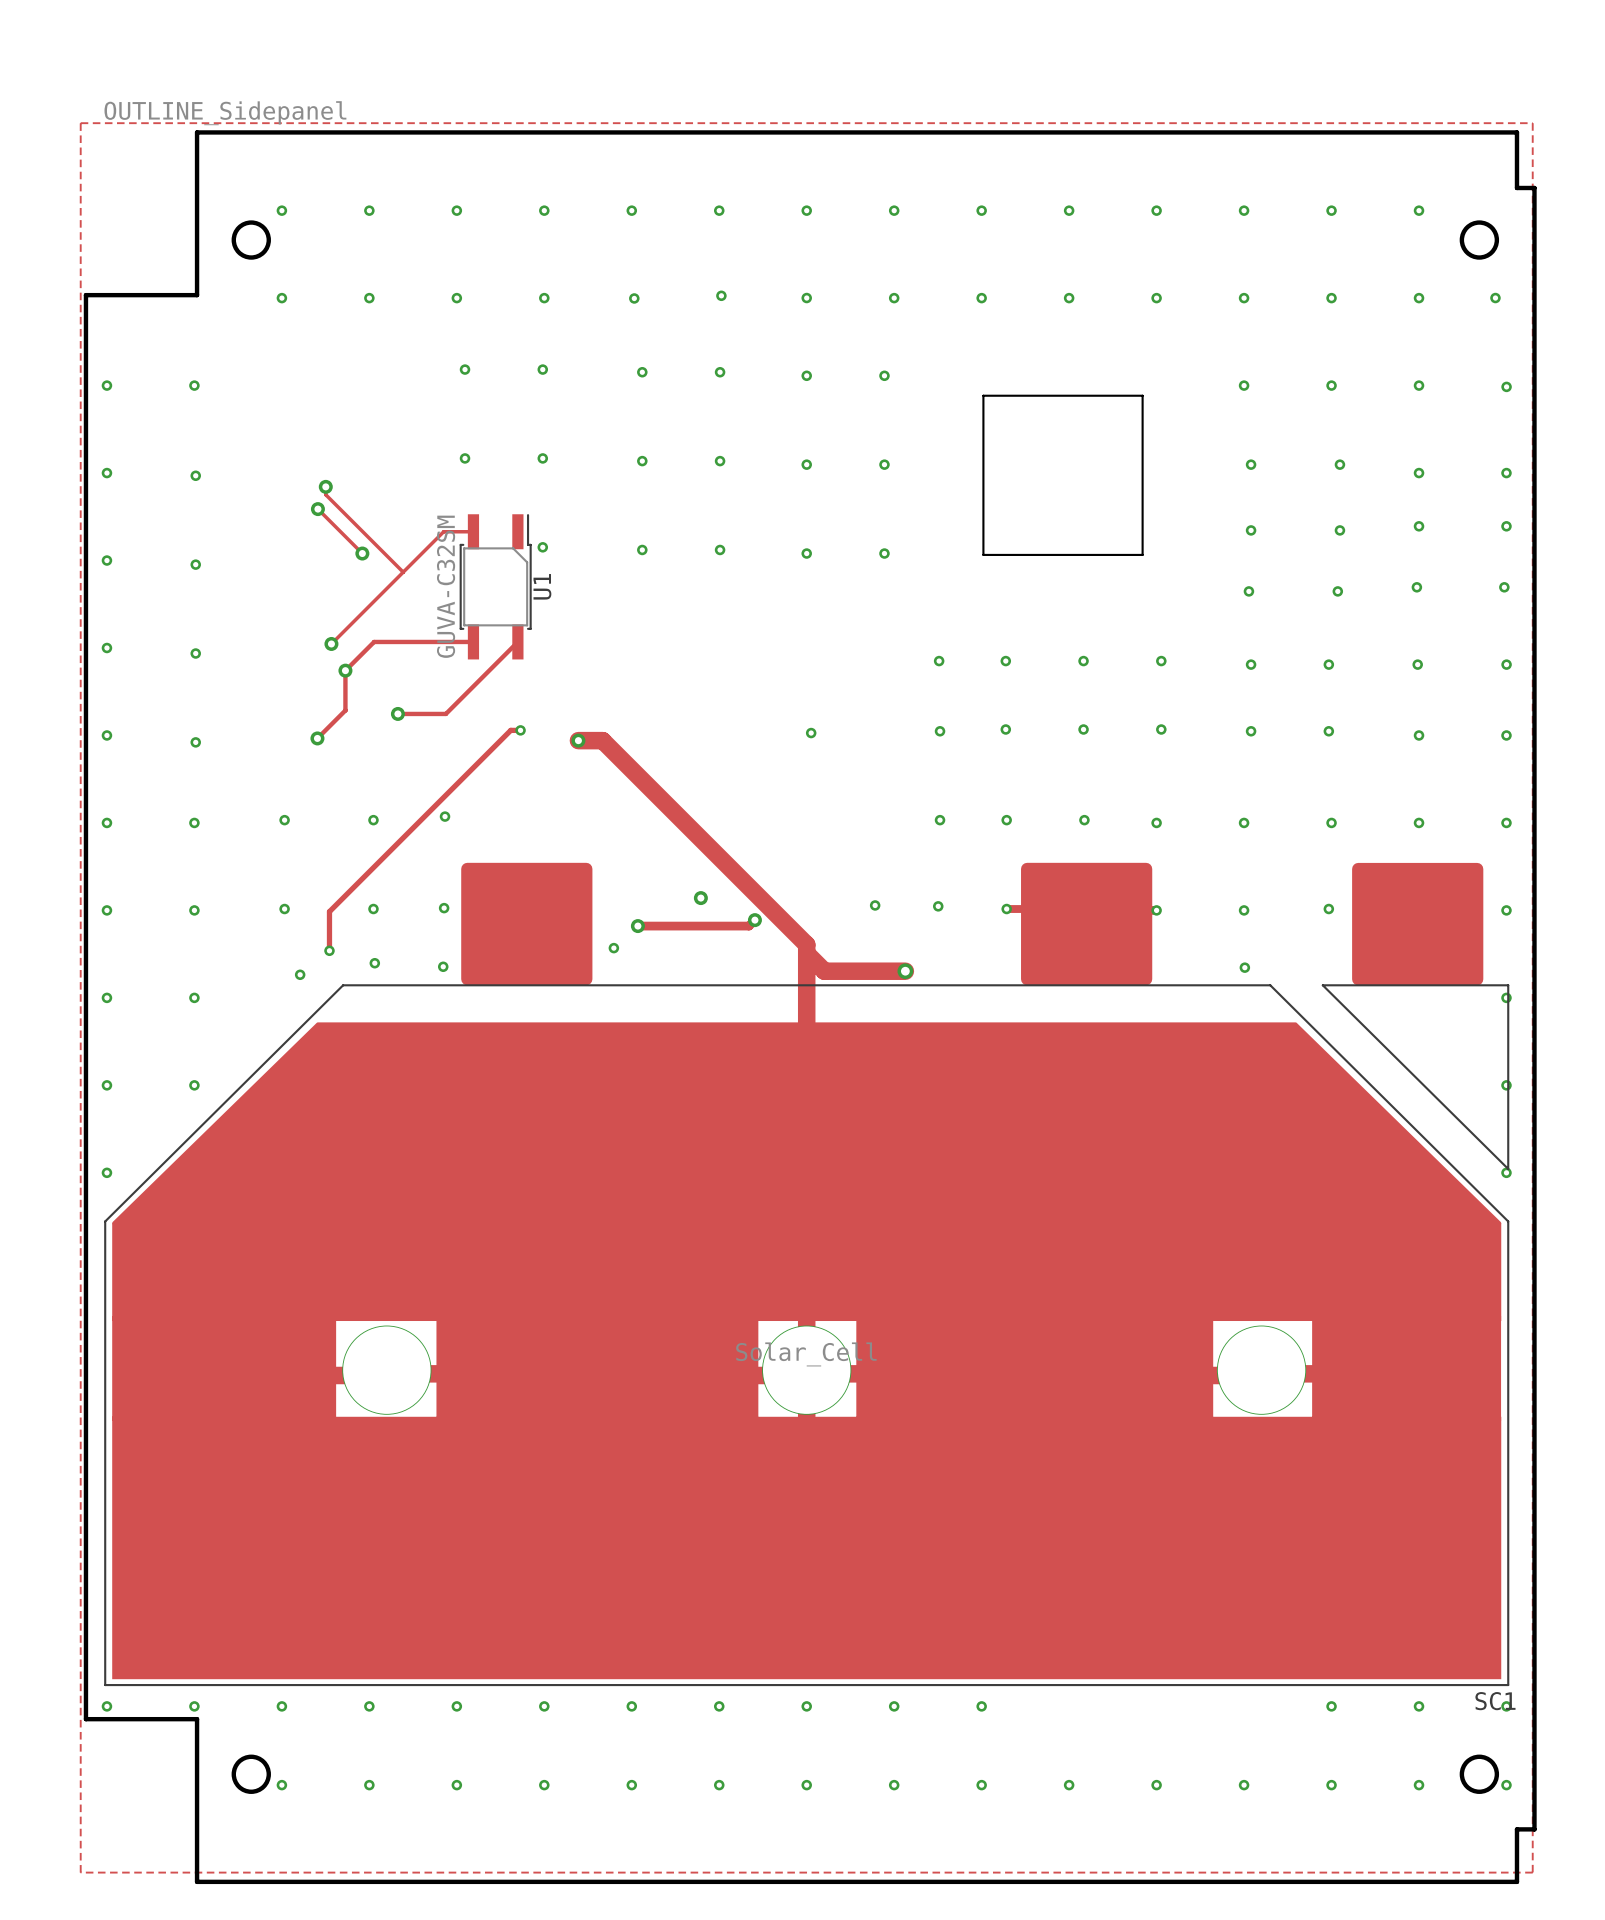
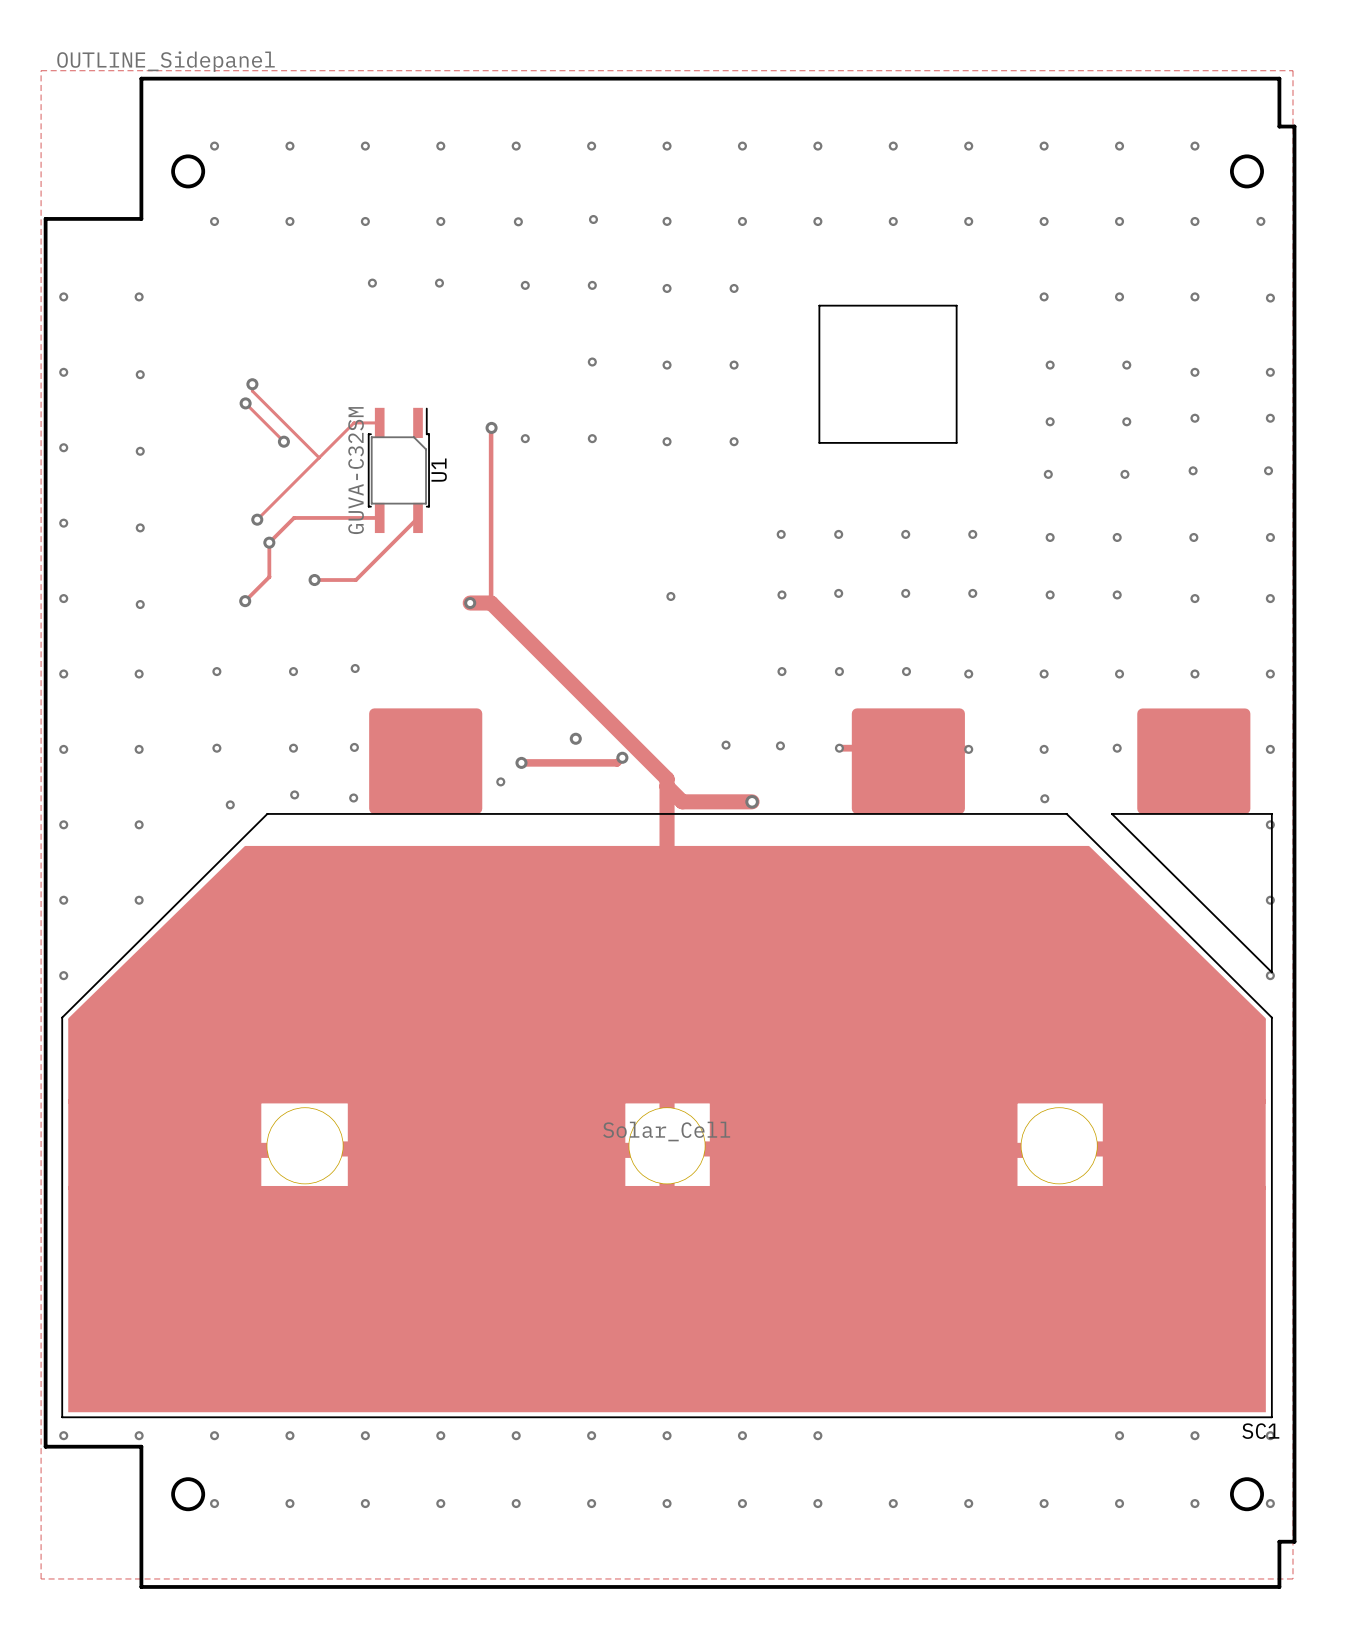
via: (465, 458) -> none
via: (542, 458) -> none
via: (642, 461) -> none
track: none -> (491, 427) (491, 603)
via: none -> (491, 427)
via: (542, 547) -> none
track: (520, 730) (510, 730) (329, 911) (329, 950) -> none
via: (520, 730) -> none
via: (329, 950) -> none

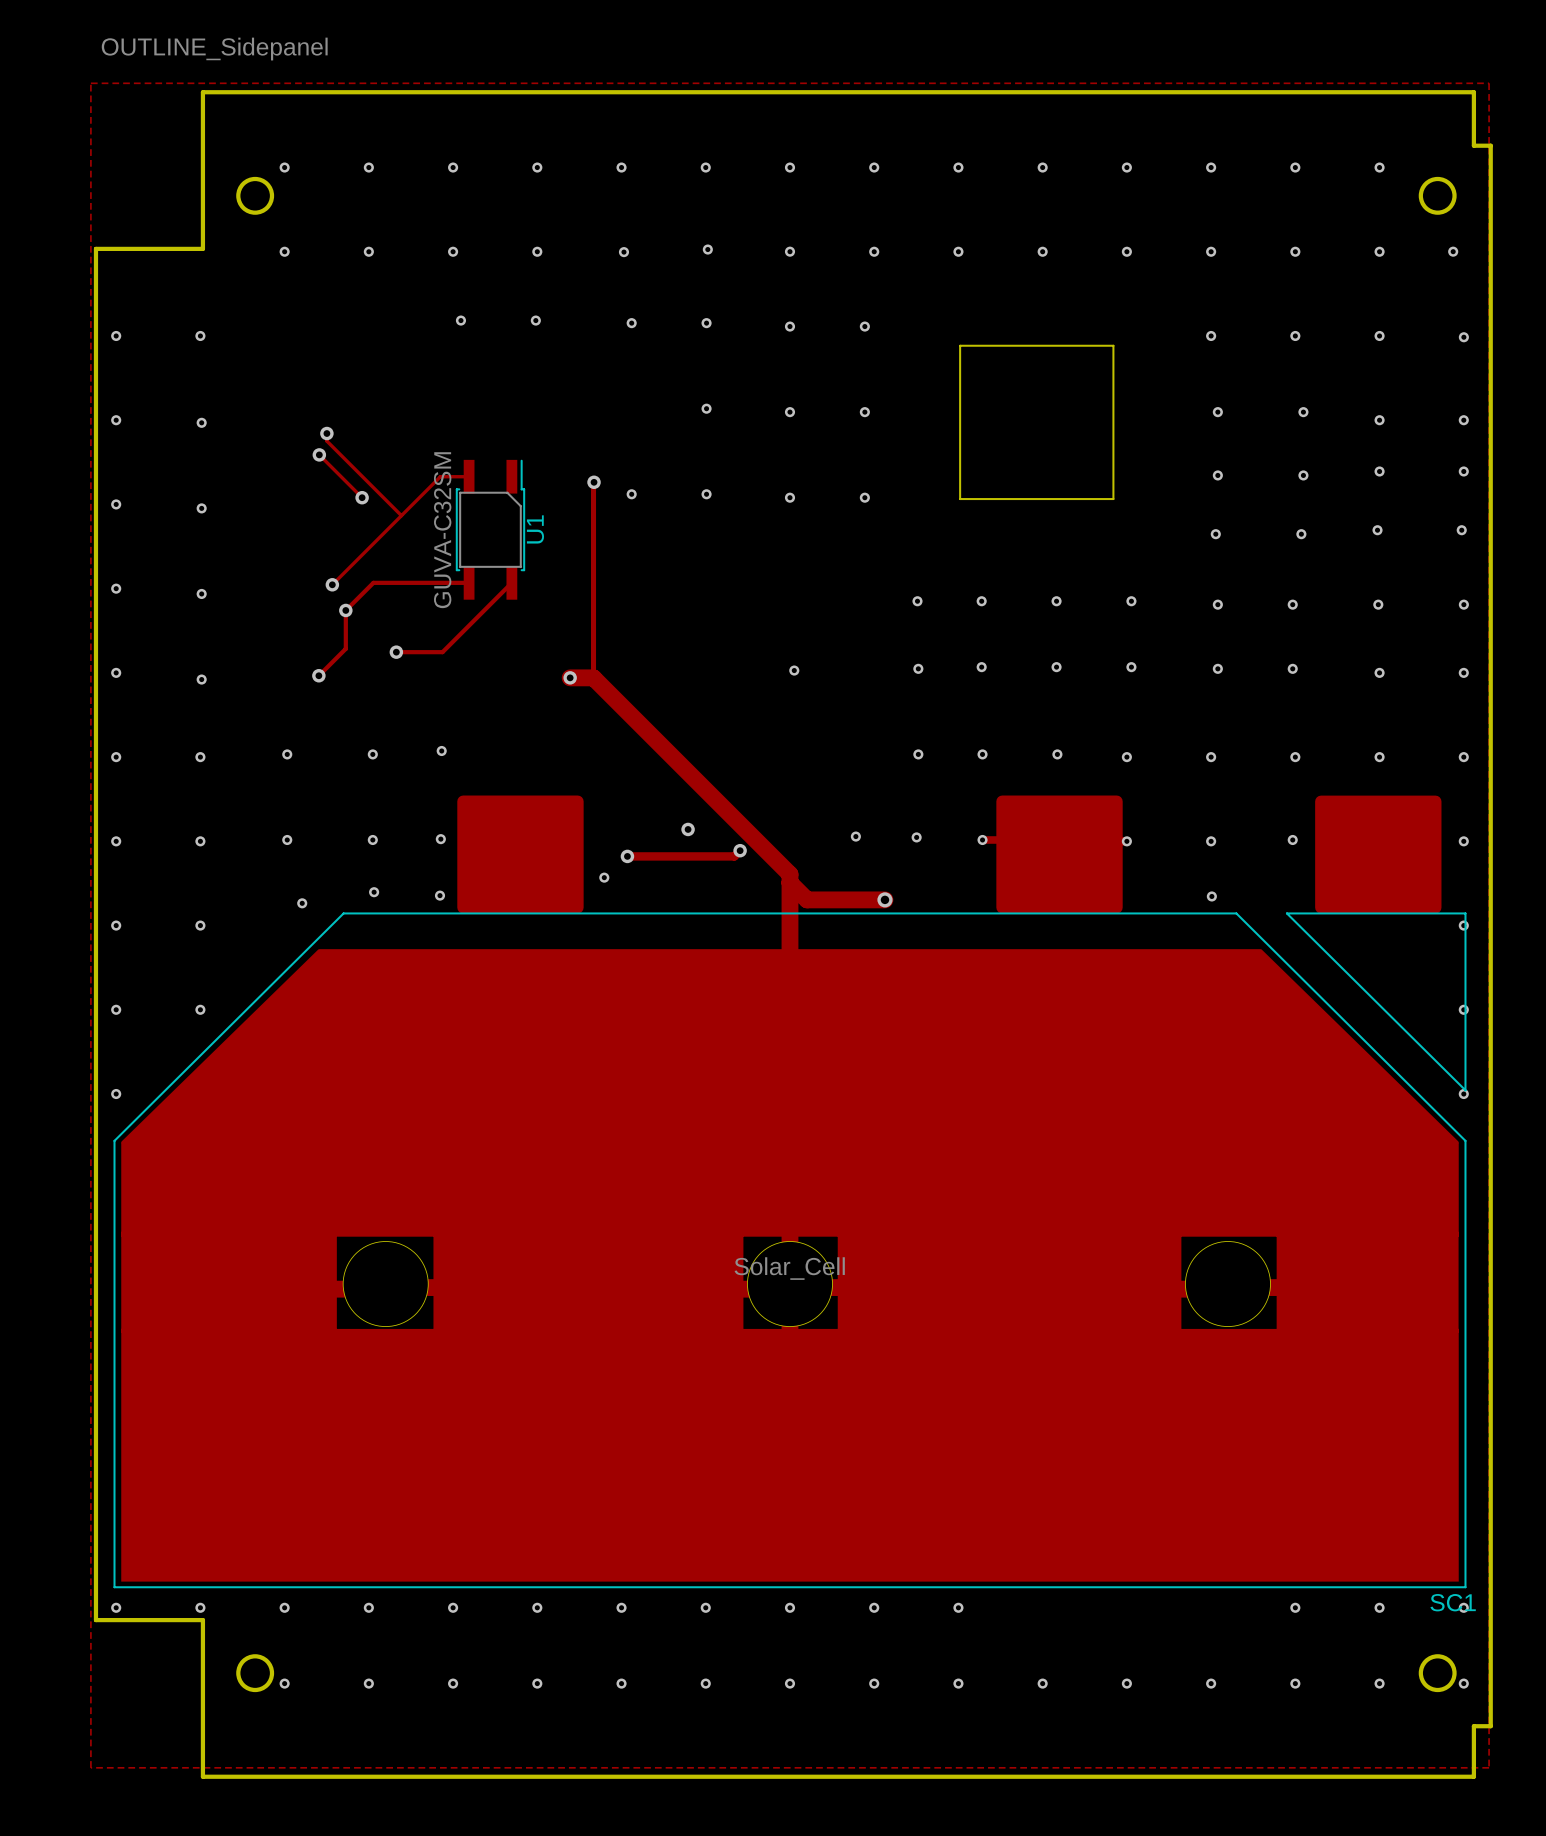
drawing shape: [43, 51, 1297, 1589] -> [93, 37, 1493, 1779]

